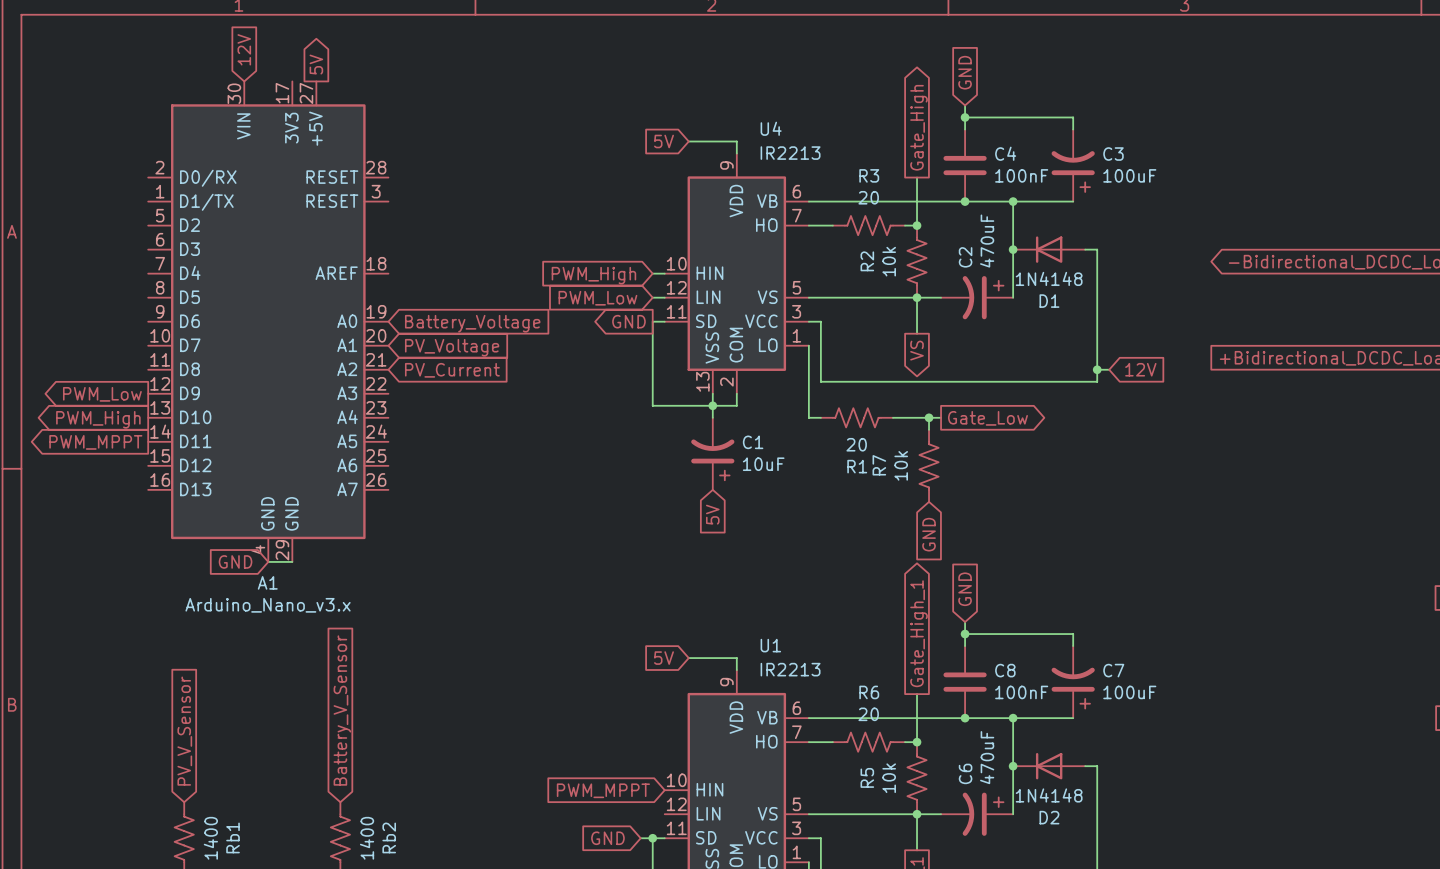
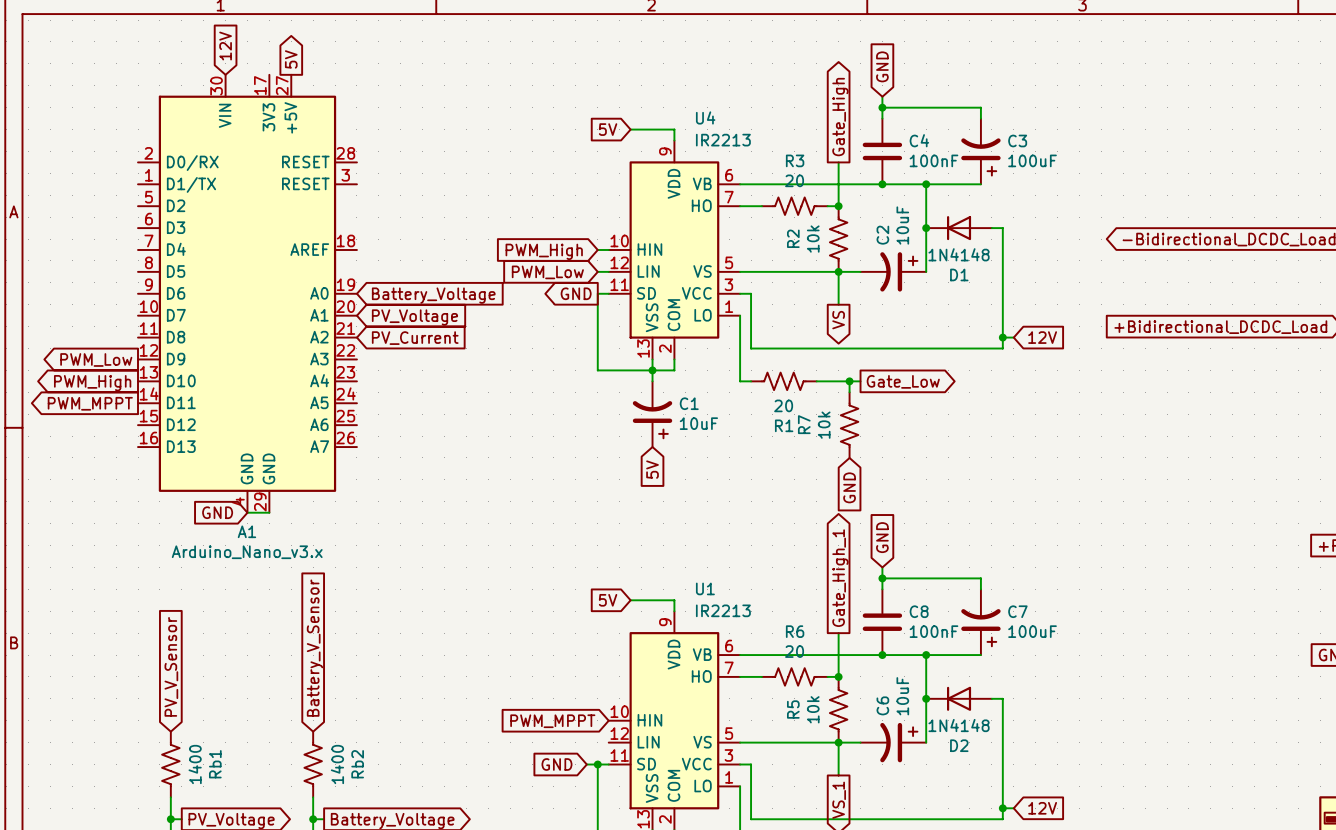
C2 value: 470uF (987, 241) -> 10uF (902, 225)
C6 value: 470uF (987, 757) -> 10uF (902, 696)

